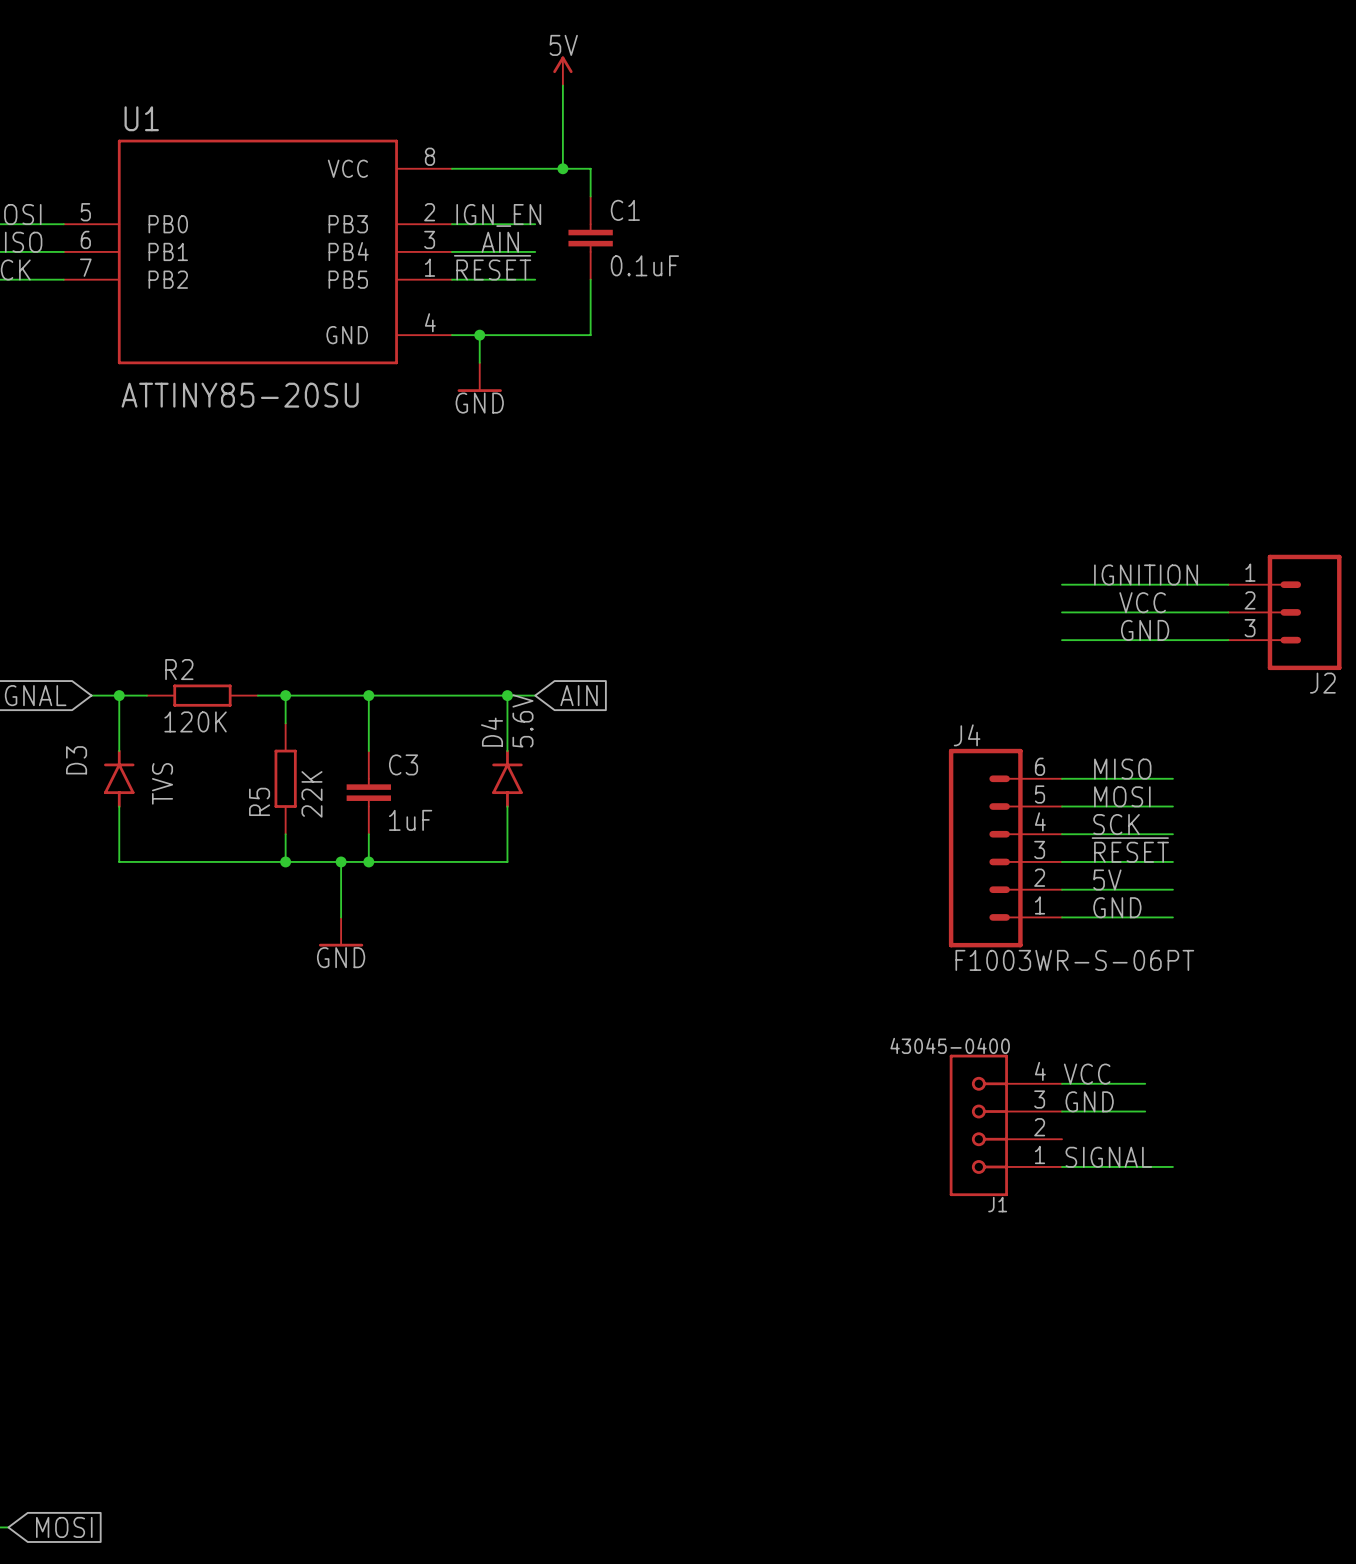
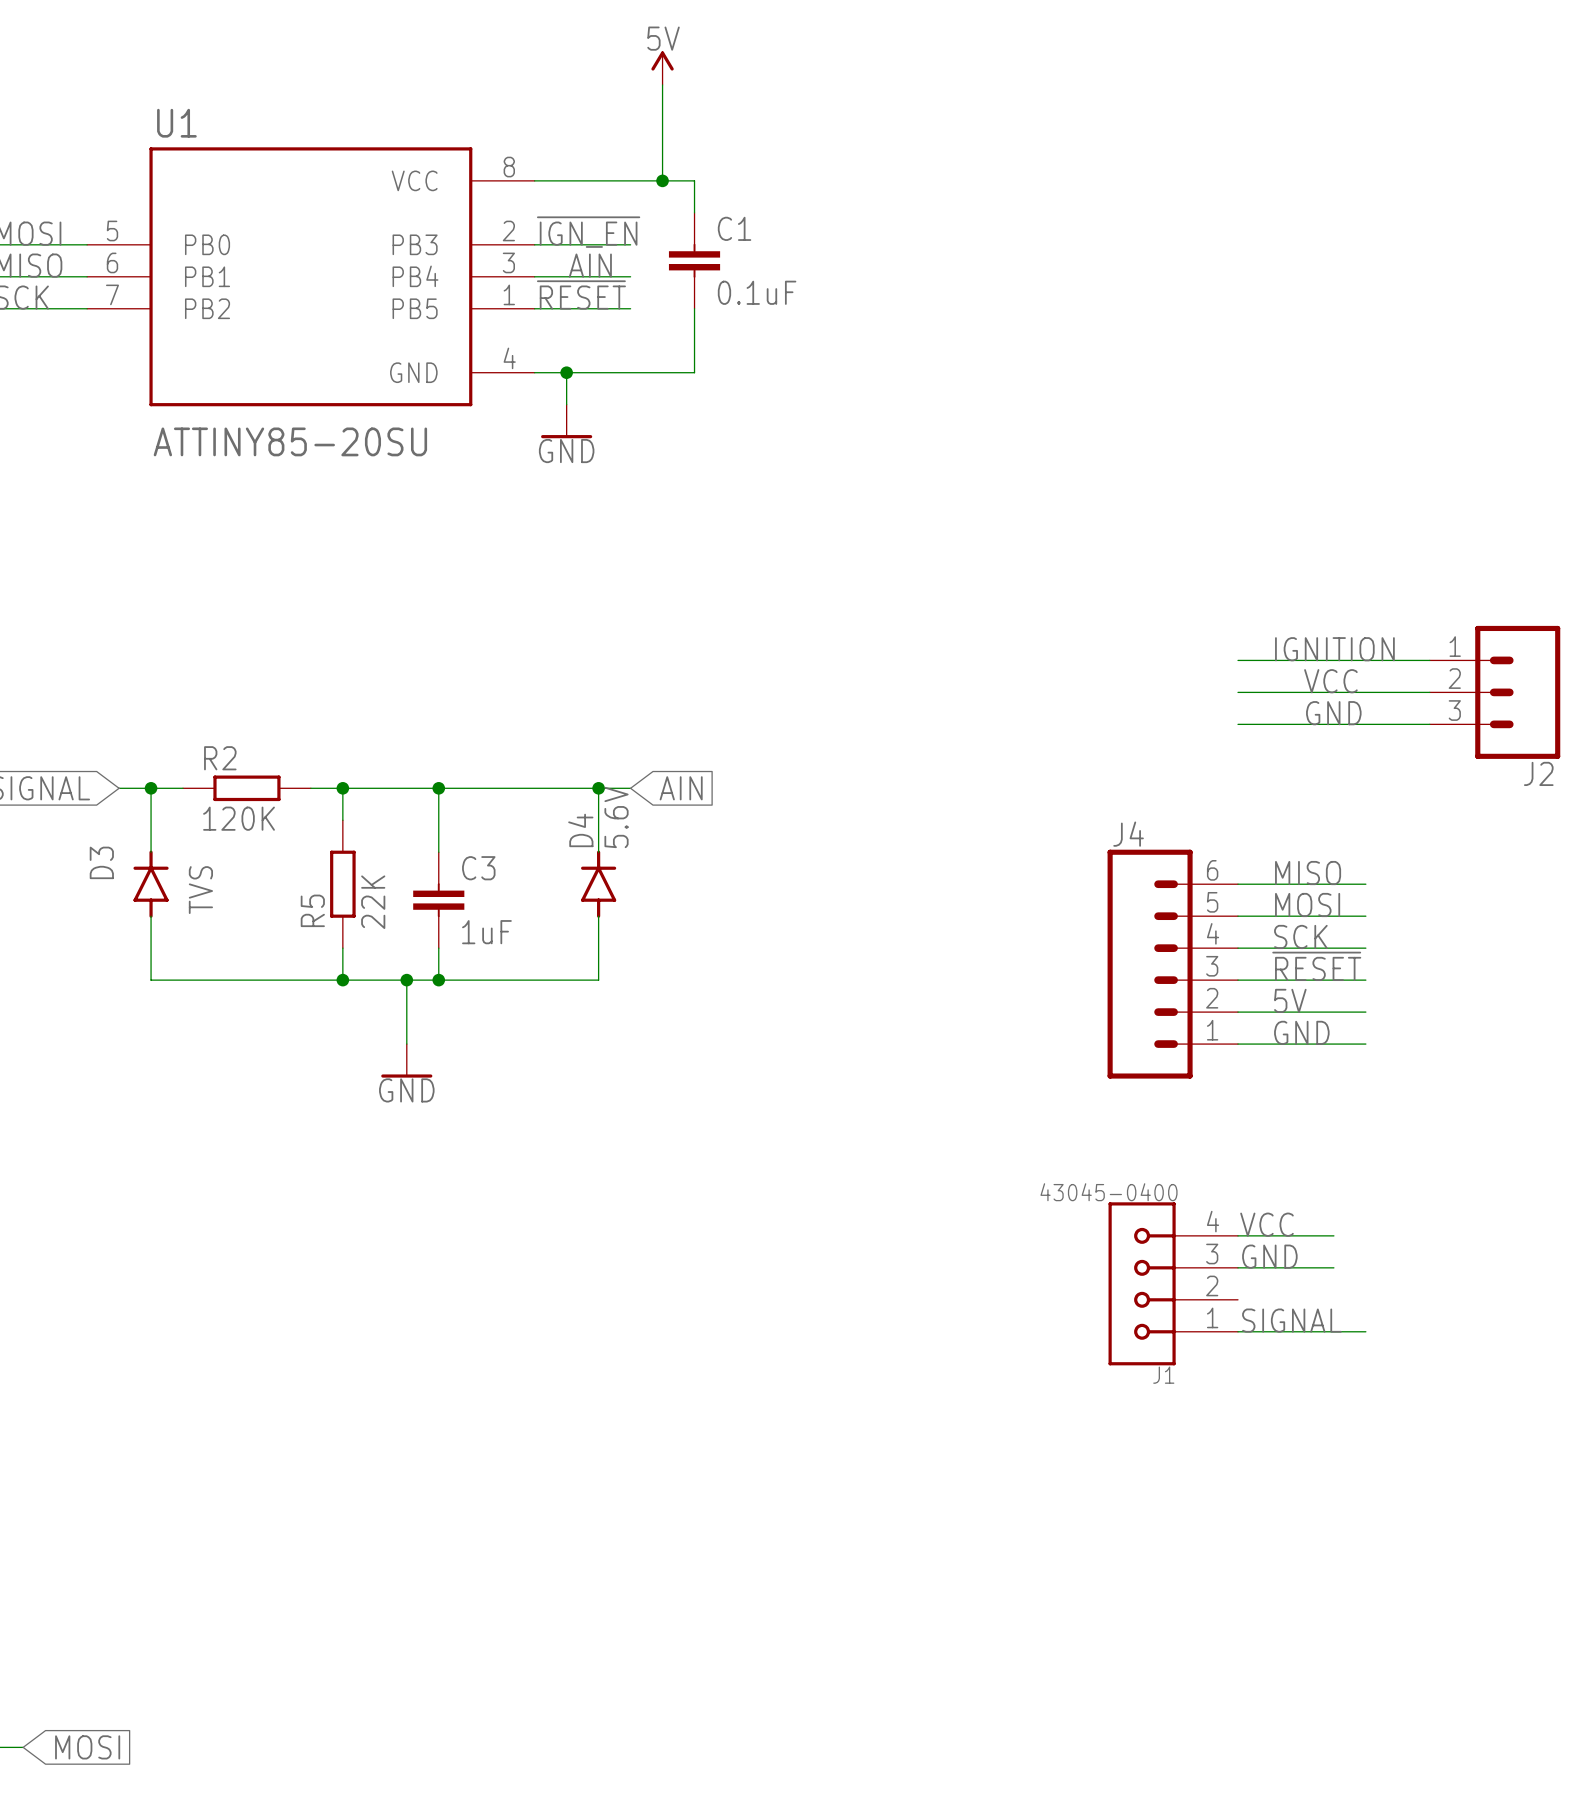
label: IGN_EN (498, 215) -> ~{IGN_EN} (588, 232)
J4 value: F1003WR-S-06PT (1074, 960) -> none

